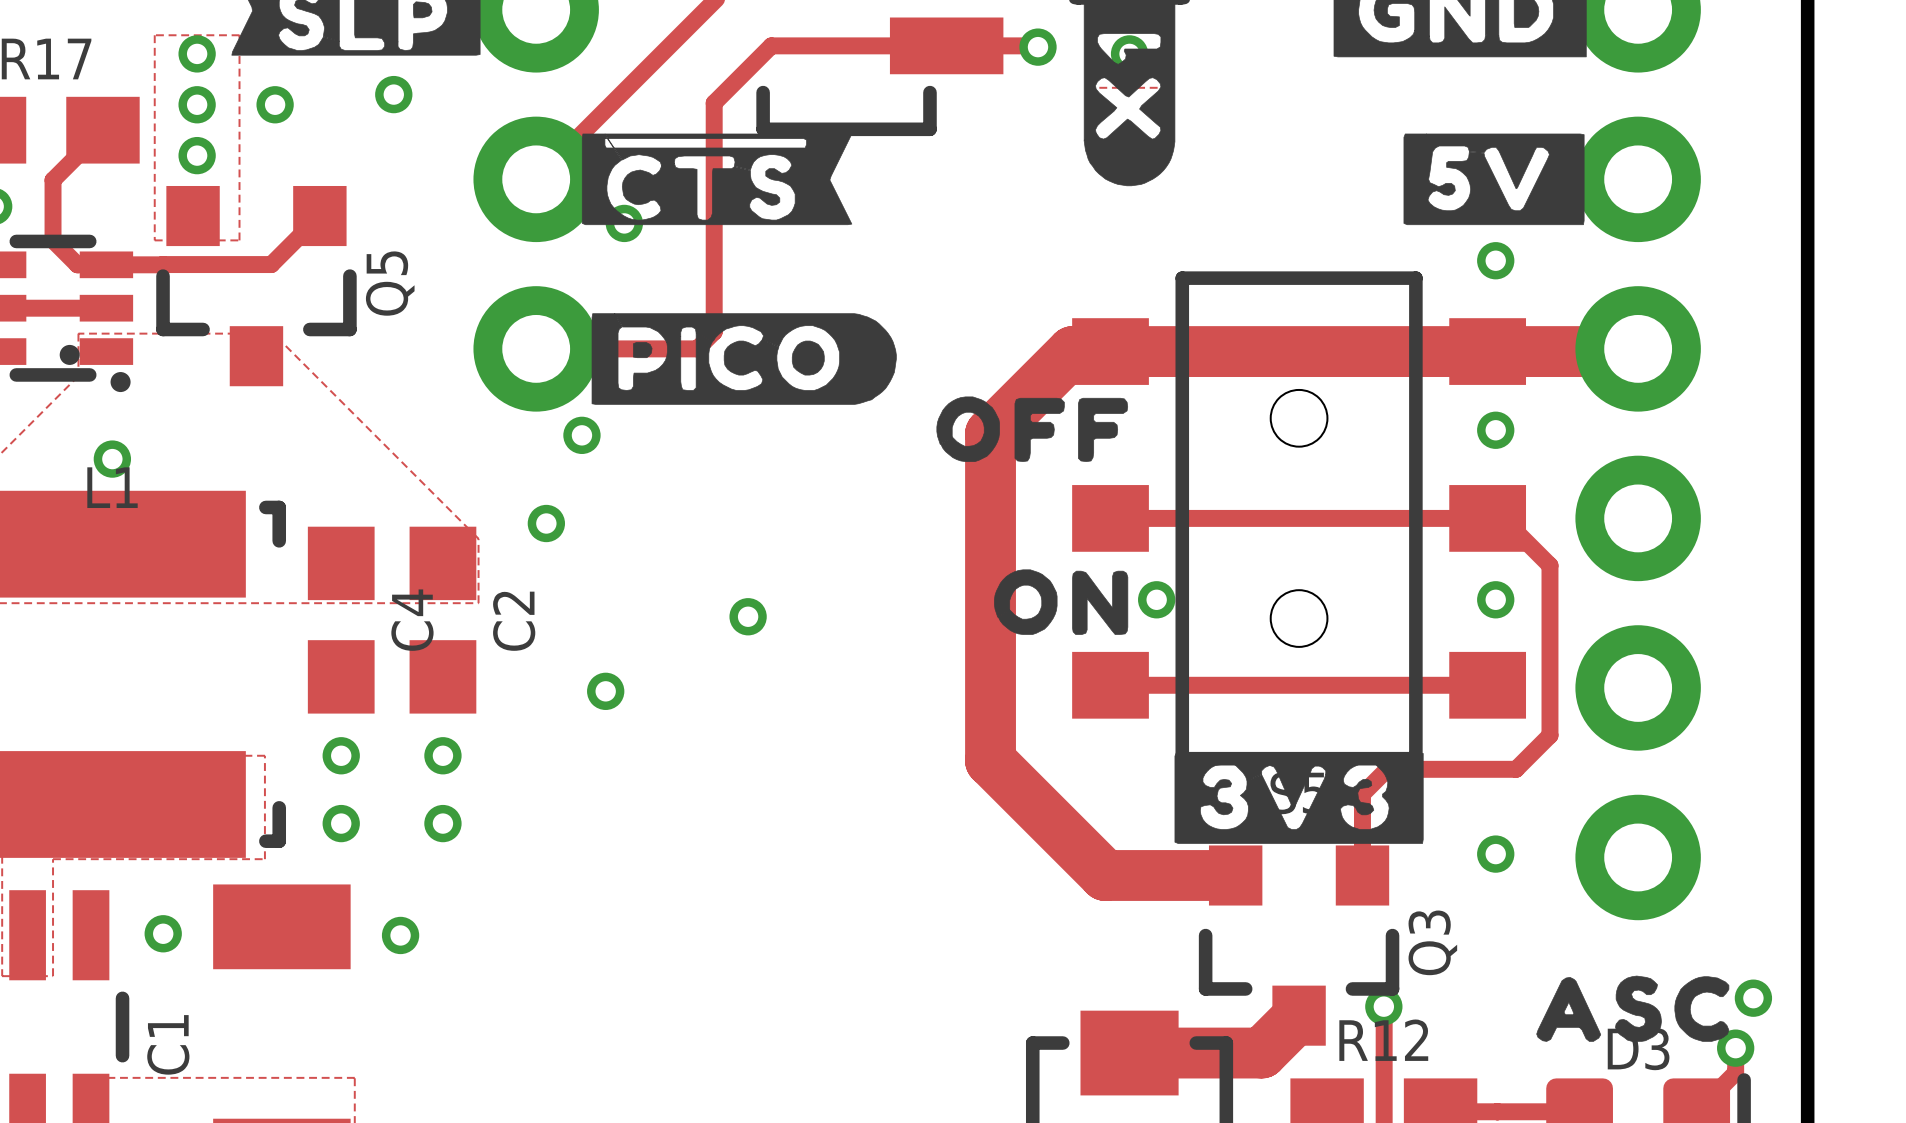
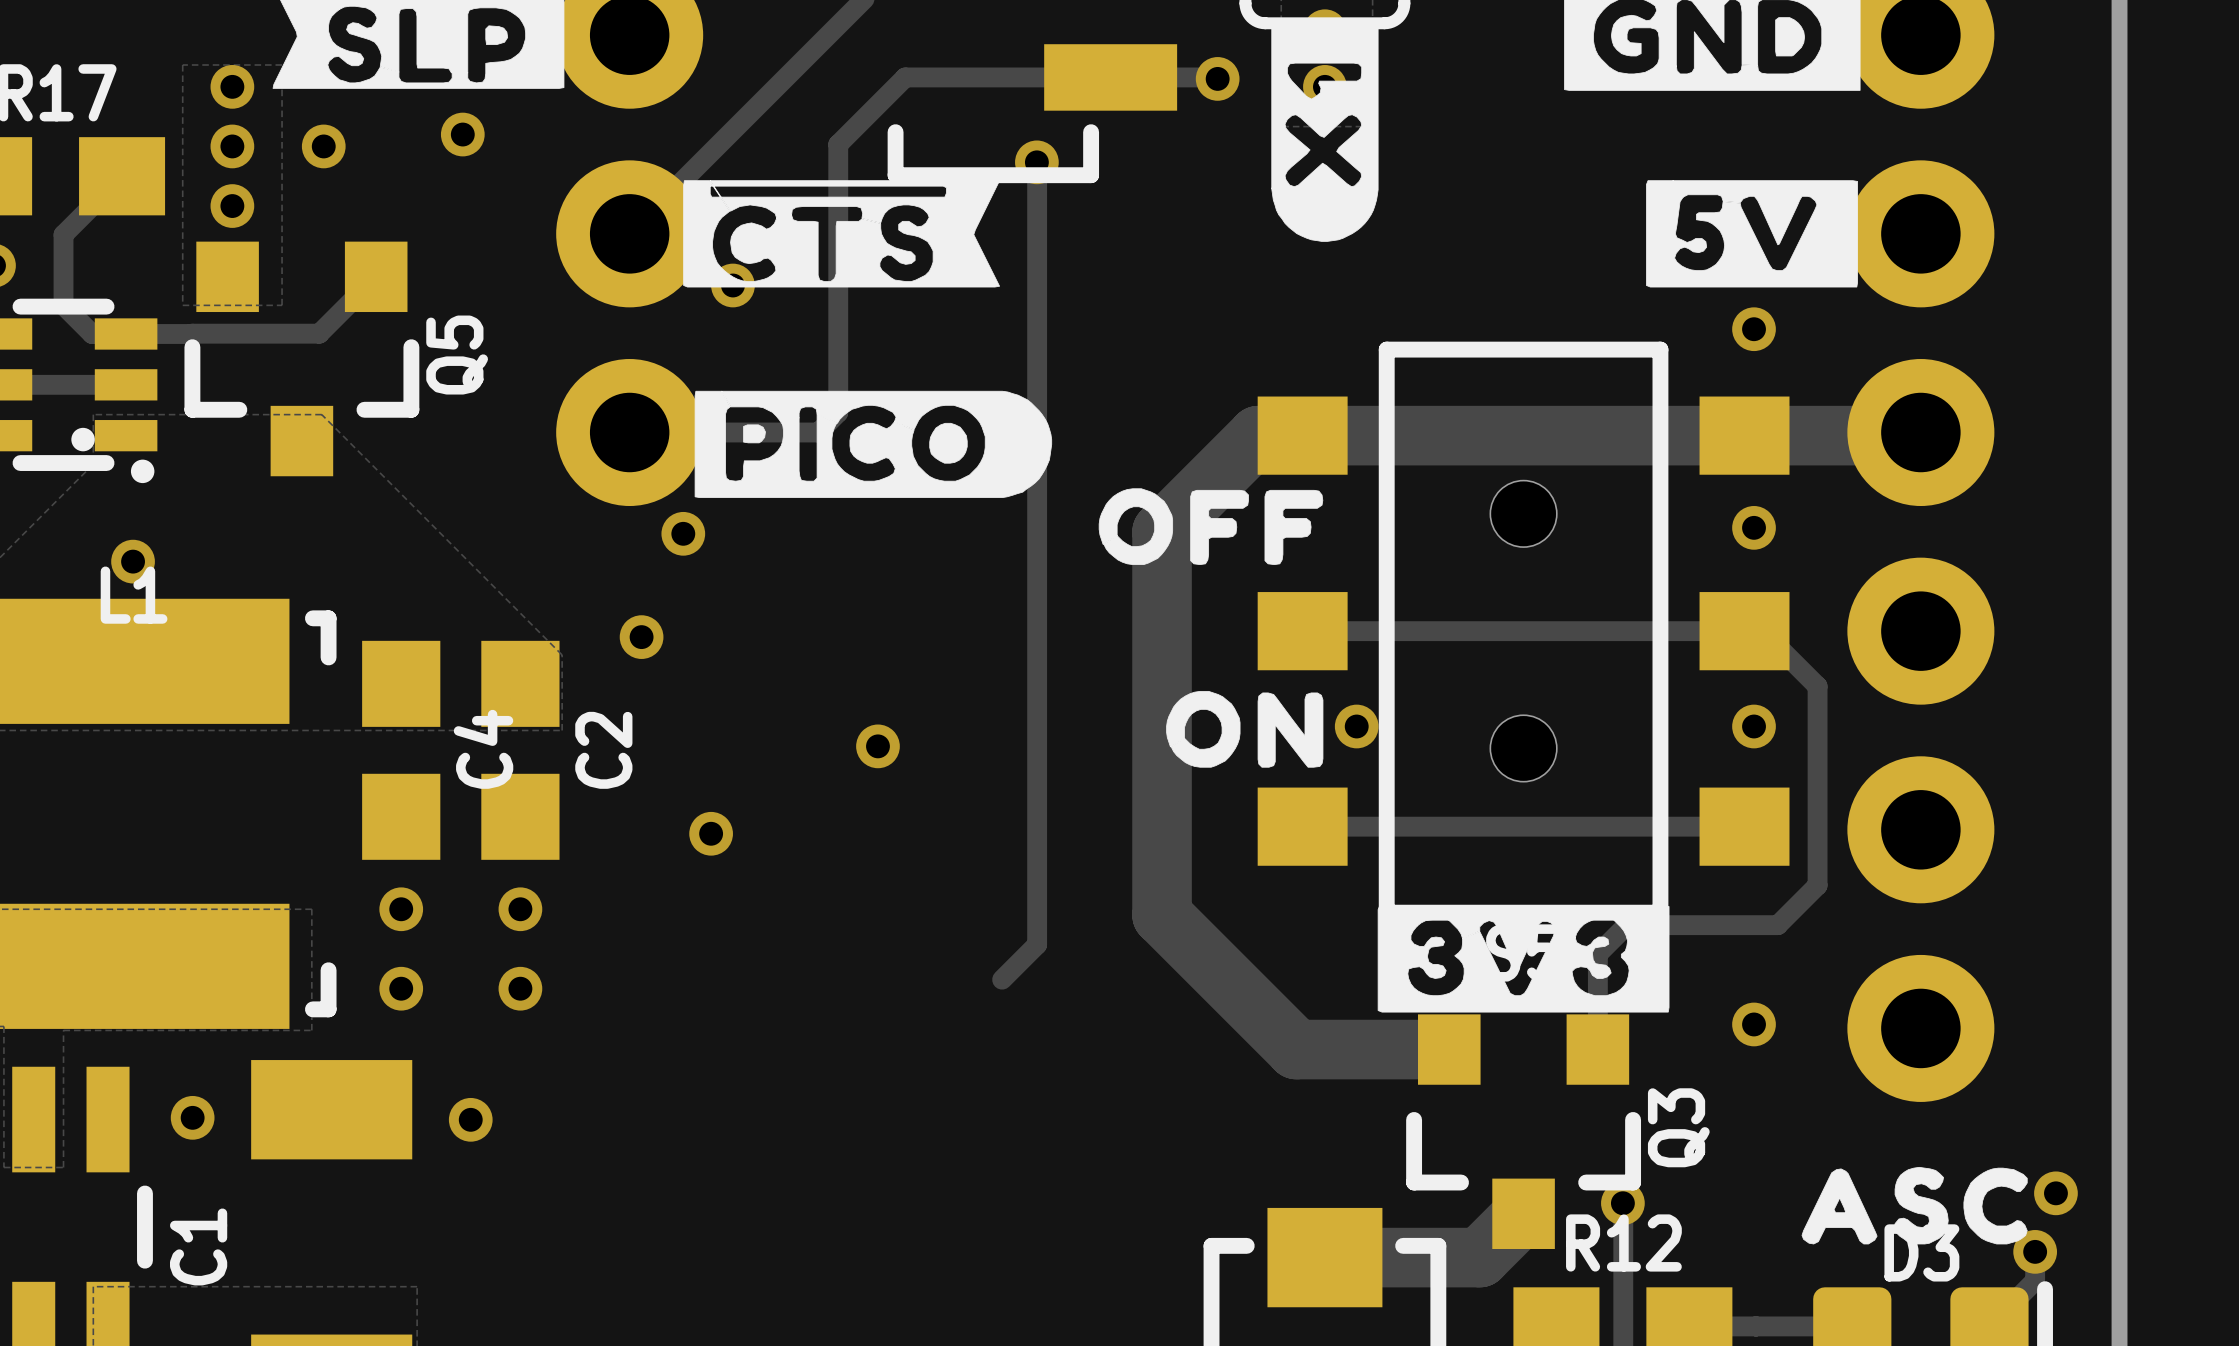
track: none -> (1037, 162) (1037, 944) (1002, 979)
via: none -> (1036, 162)

